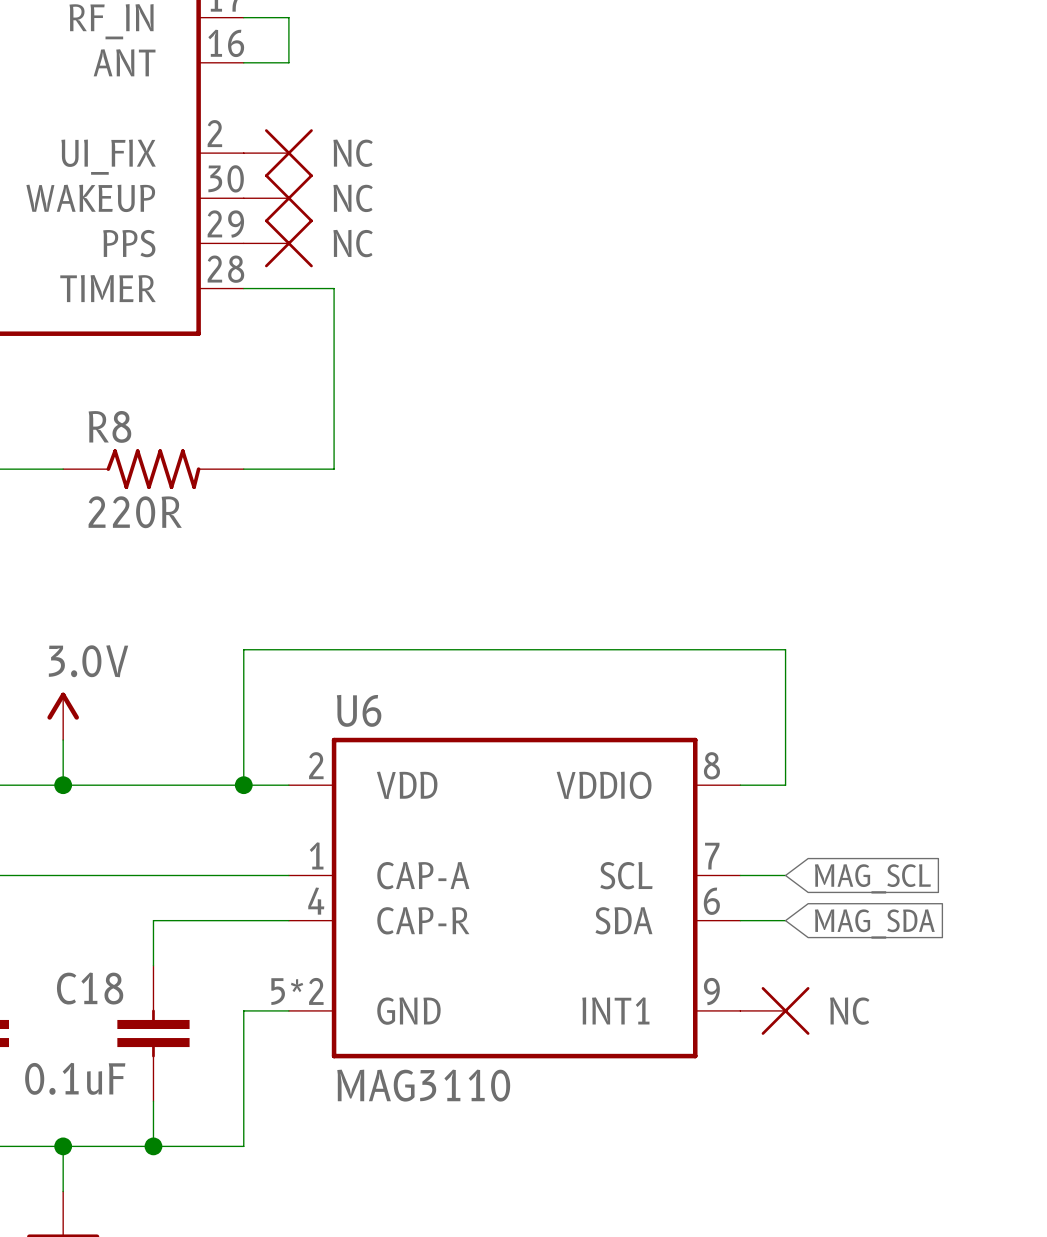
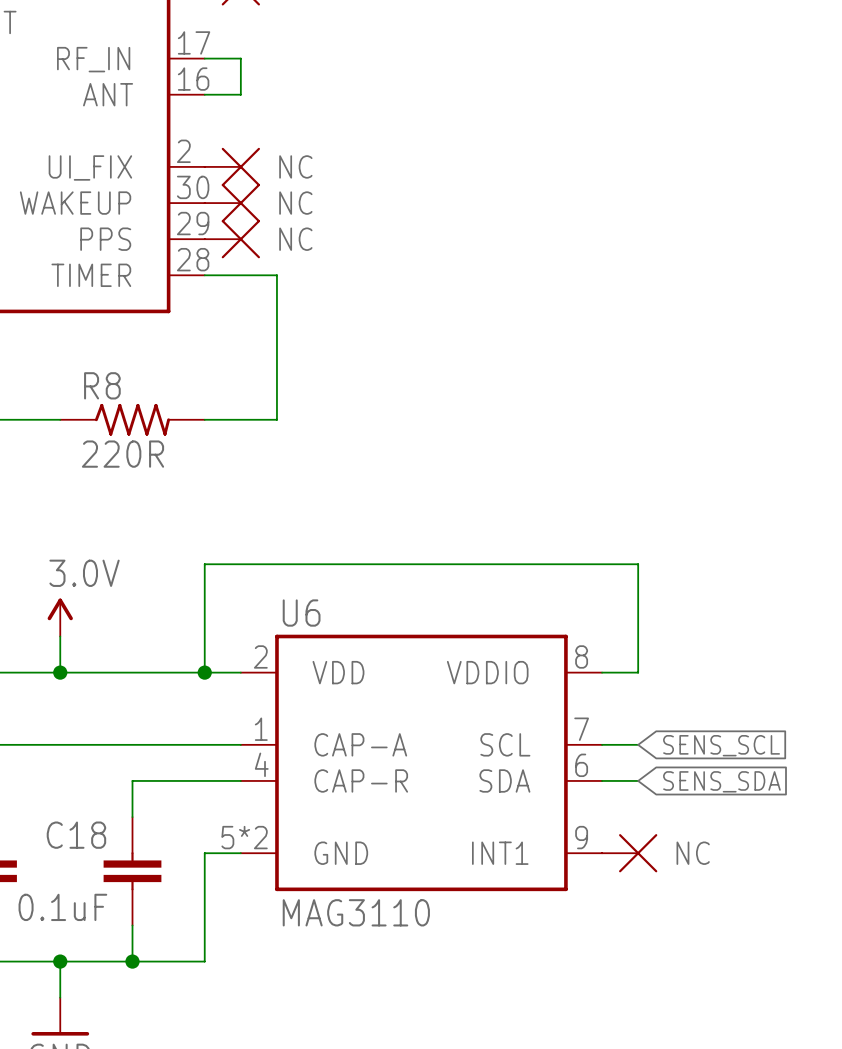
global label: MAG_SCL (872, 878) -> SENS_SCL (721, 745)
global label: MAG_SDA (874, 924) -> SENS_SDA (721, 781)

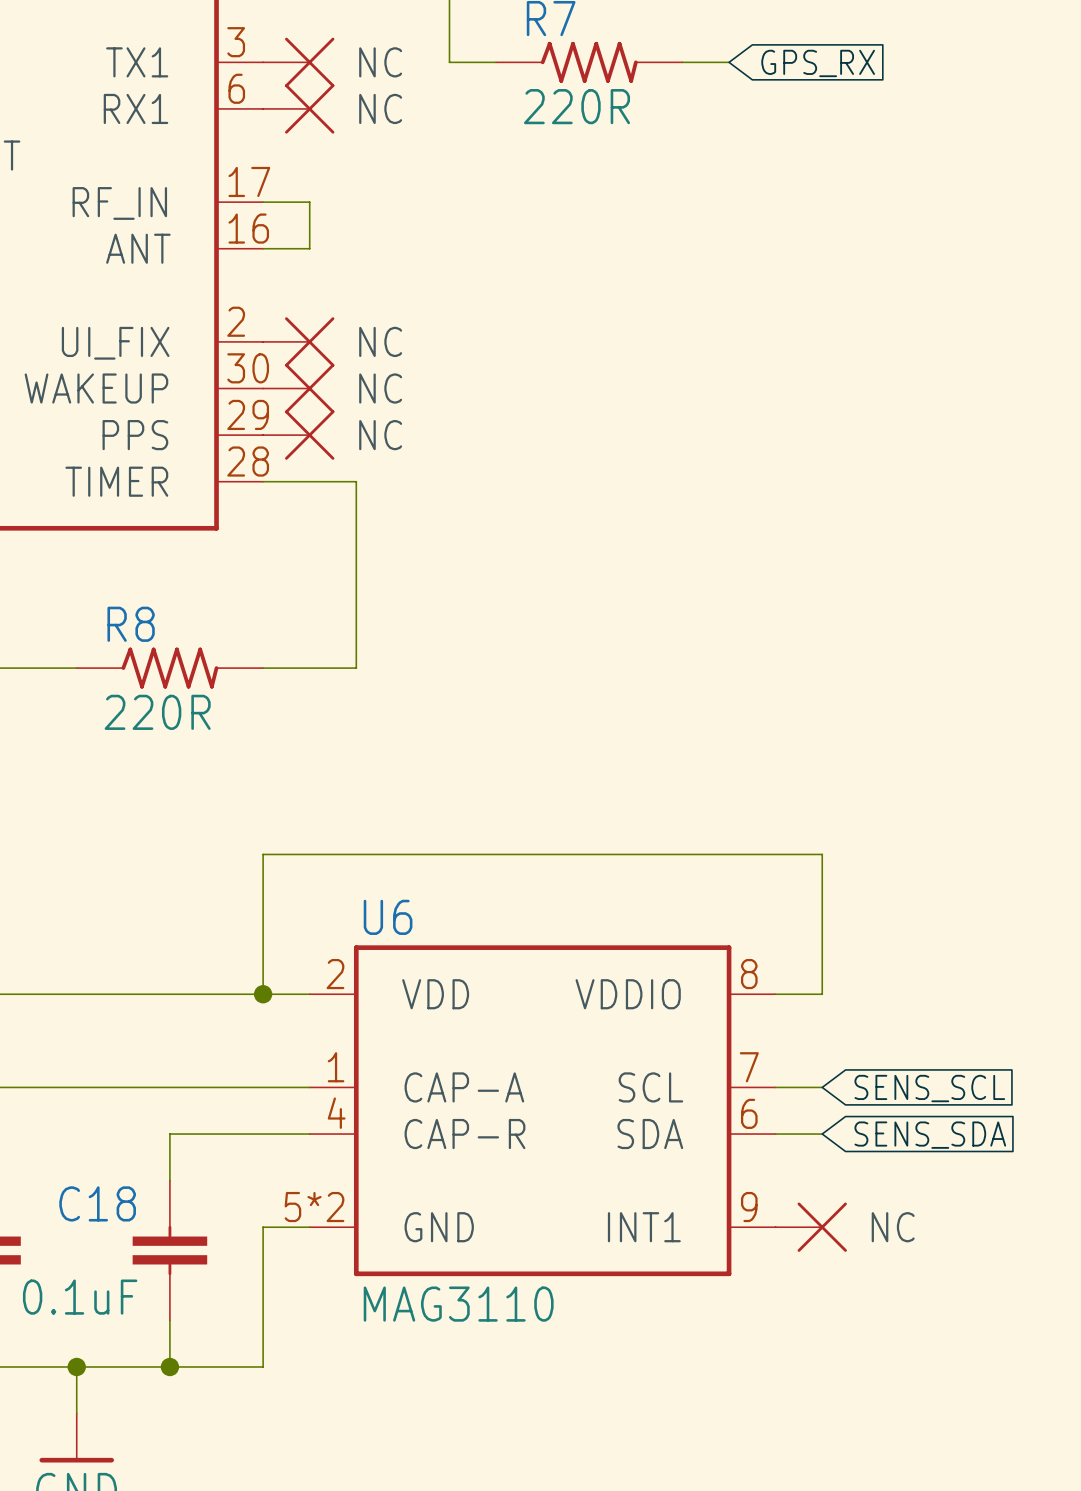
power symbol: 3.0V (60, 617) -> none
wire: (60, 636) (60, 672) -> none
junction: (60, 672) -> none

